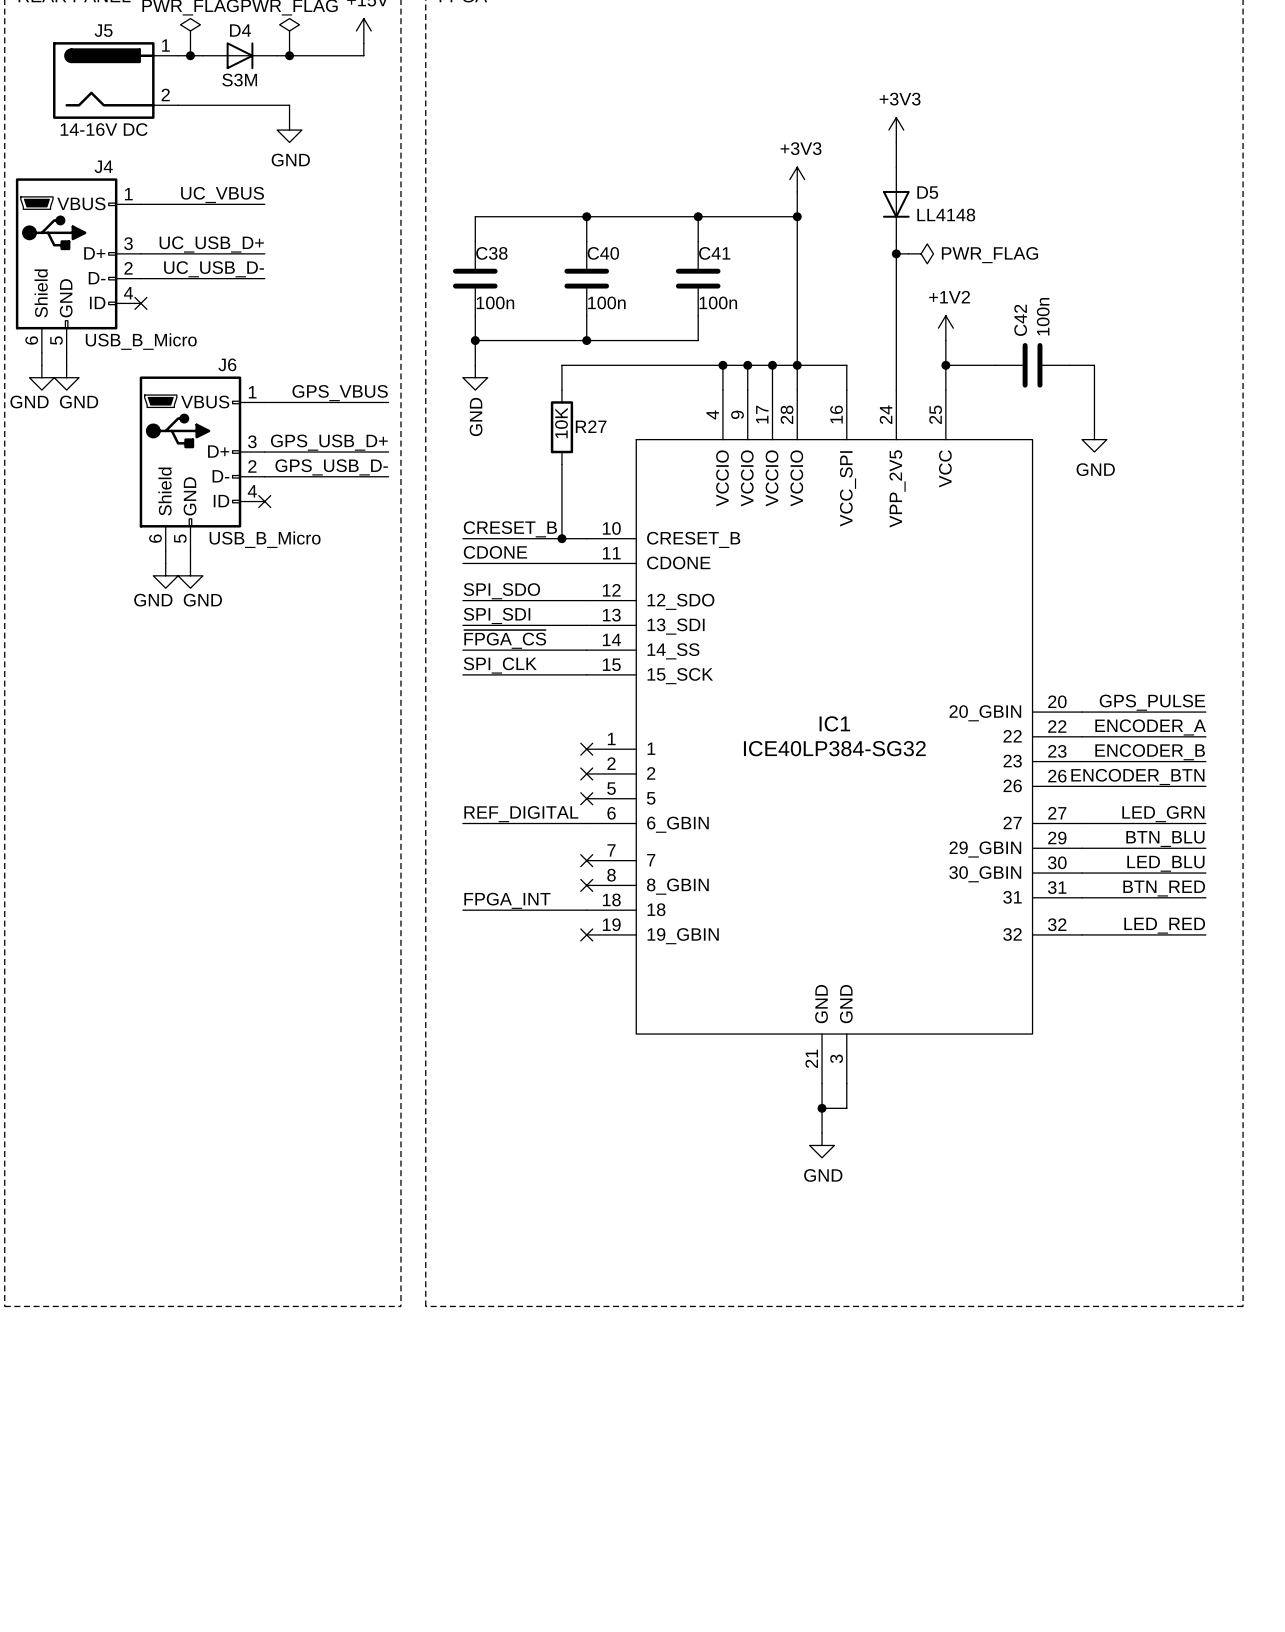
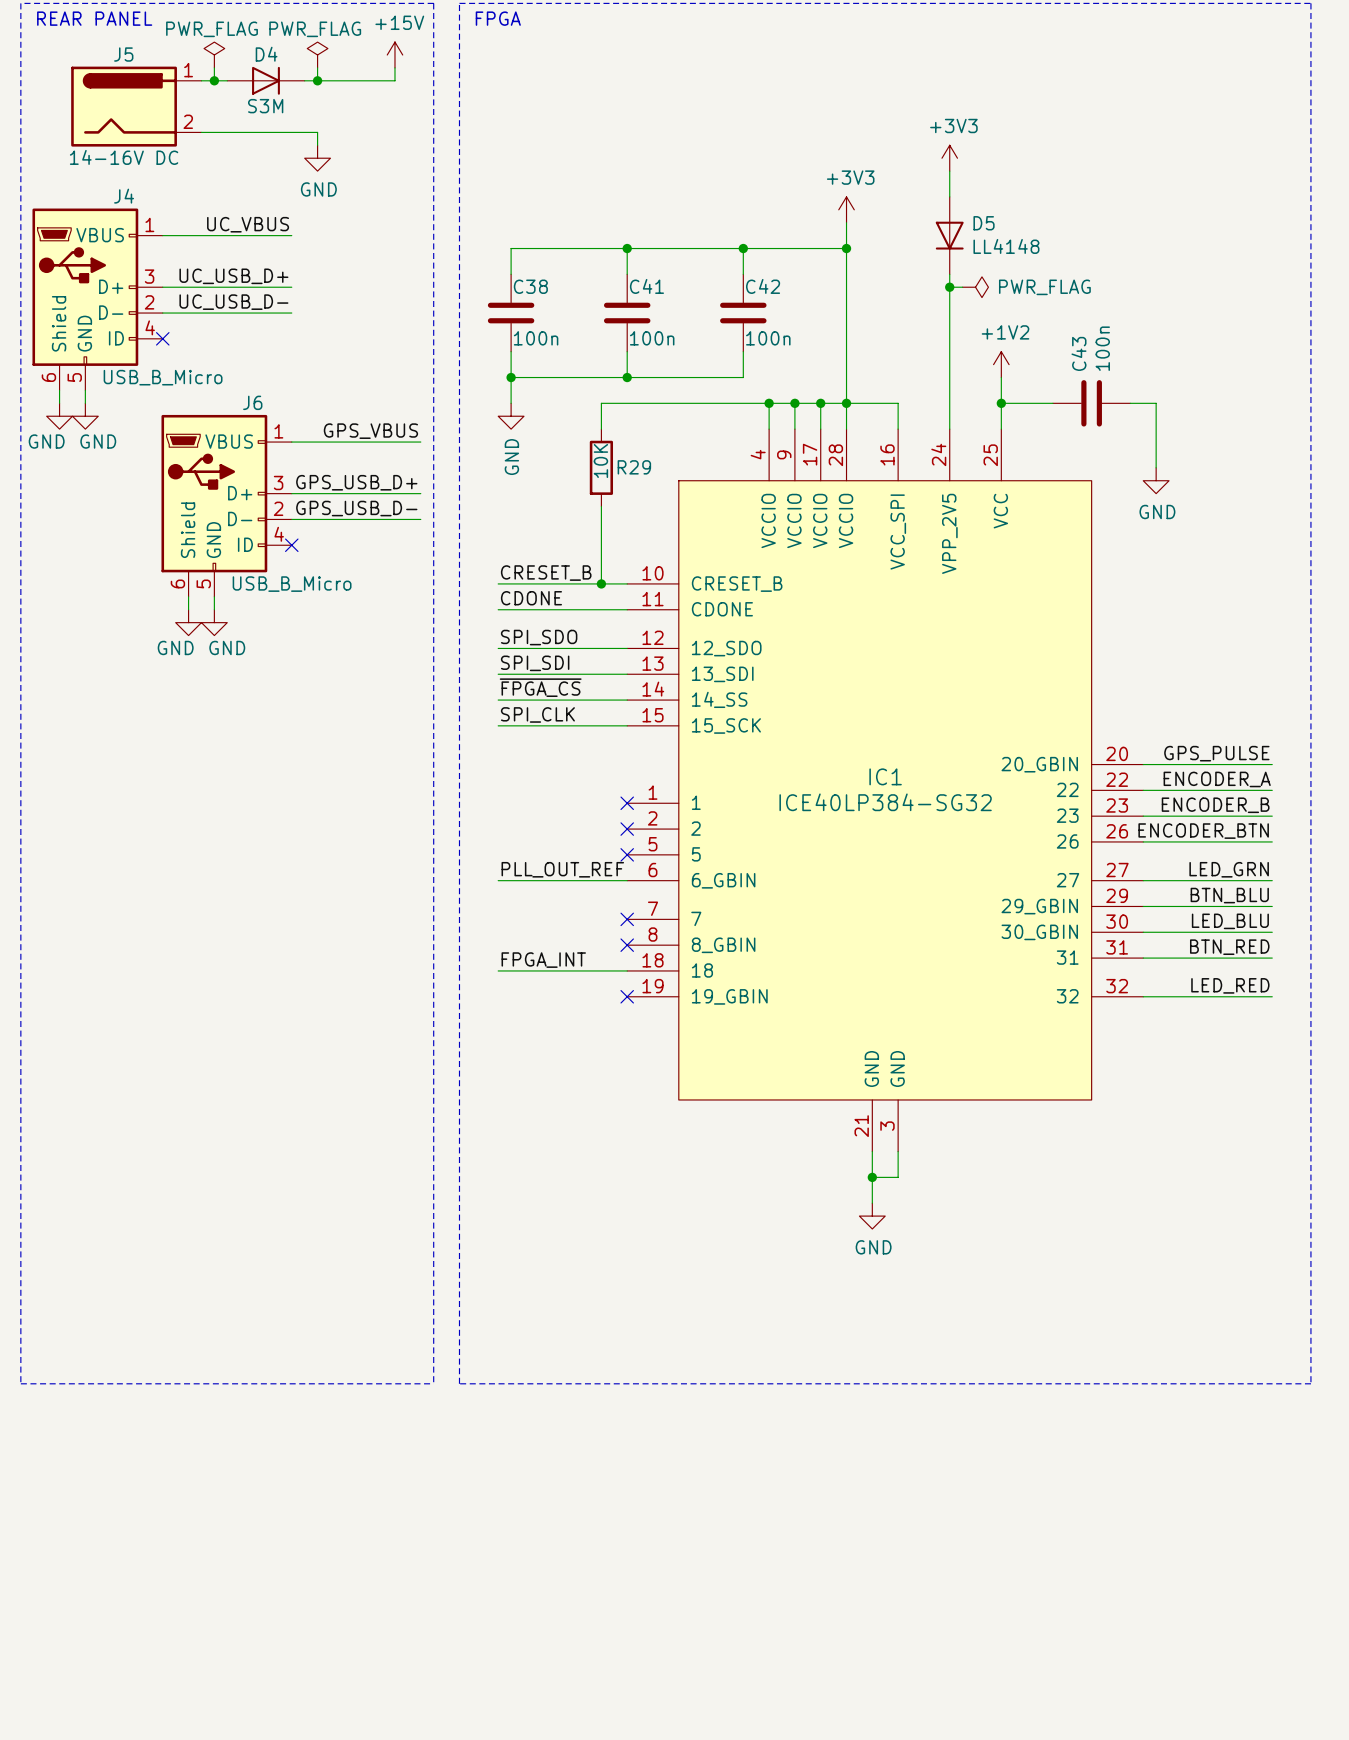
C40 name: C40 (603, 253) -> C41 (646, 286)
C41 name: C41 (714, 253) -> C42 (763, 286)
C42 name: C42 (1020, 320) -> C43 (1078, 353)
R27 name: R27 (591, 426) -> R29 (634, 467)
label: REF_DIGITAL (521, 814) -> PLL_OUT_REF (562, 869)

